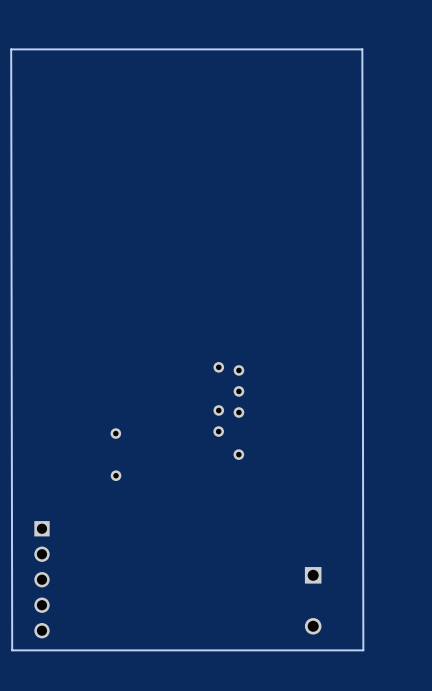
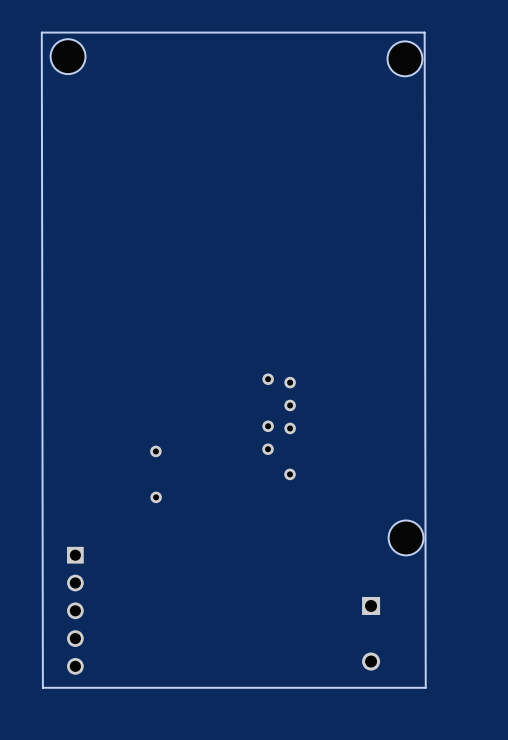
hole: none -> (68, 56)
hole: none -> (404, 58)
hole: none -> (406, 537)

